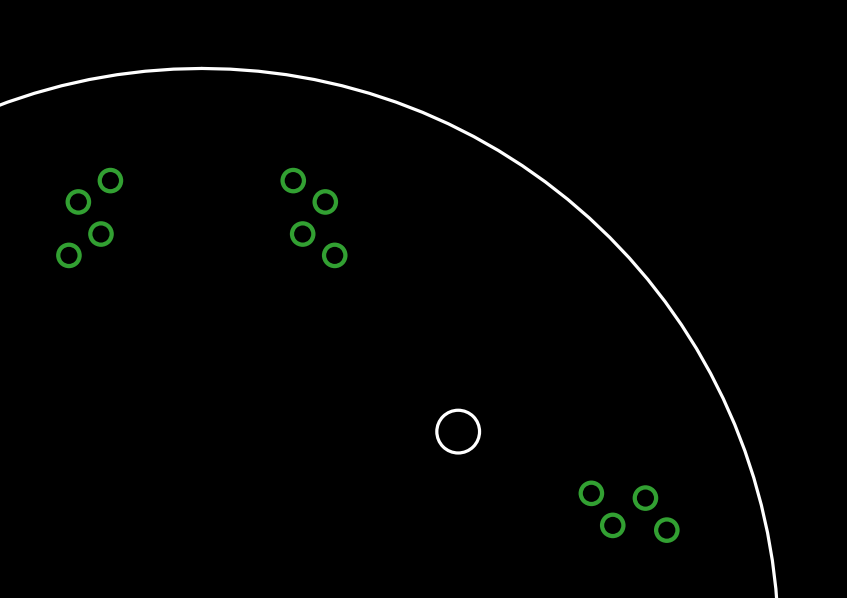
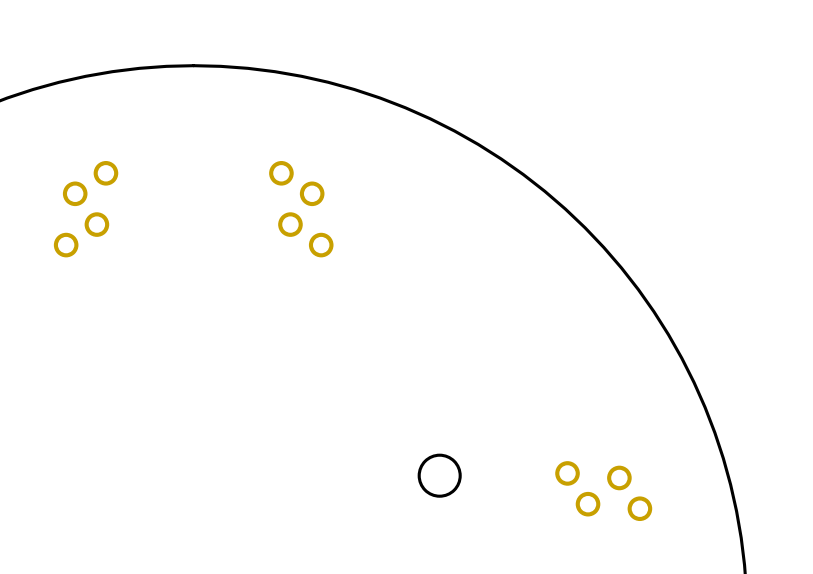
round board edge position: (458, 431) -> (439, 475)

